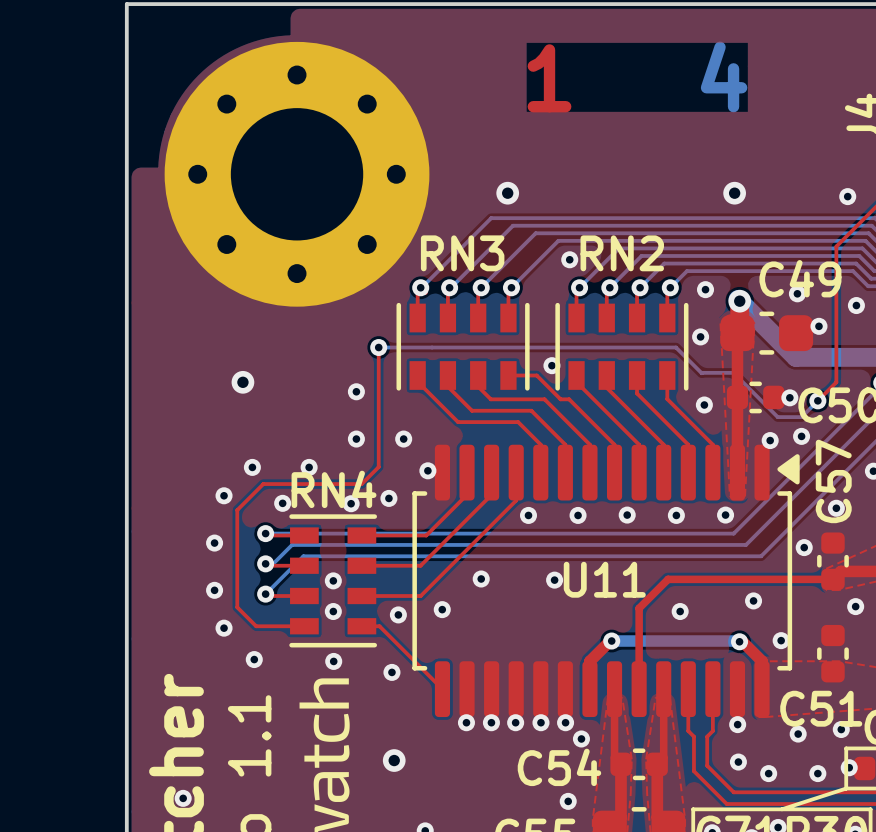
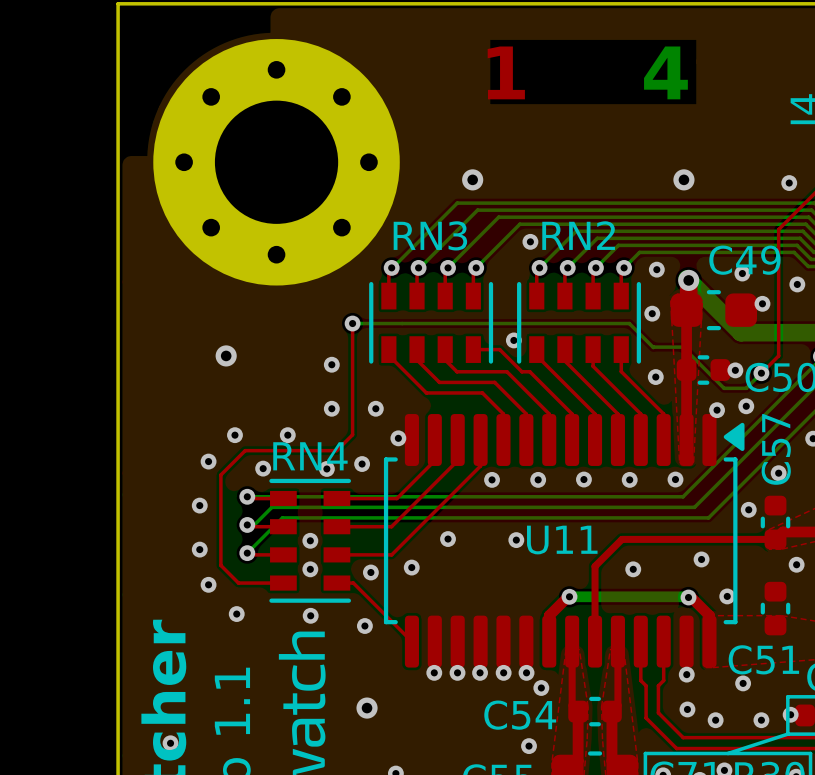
via: (841, 729) -> none

